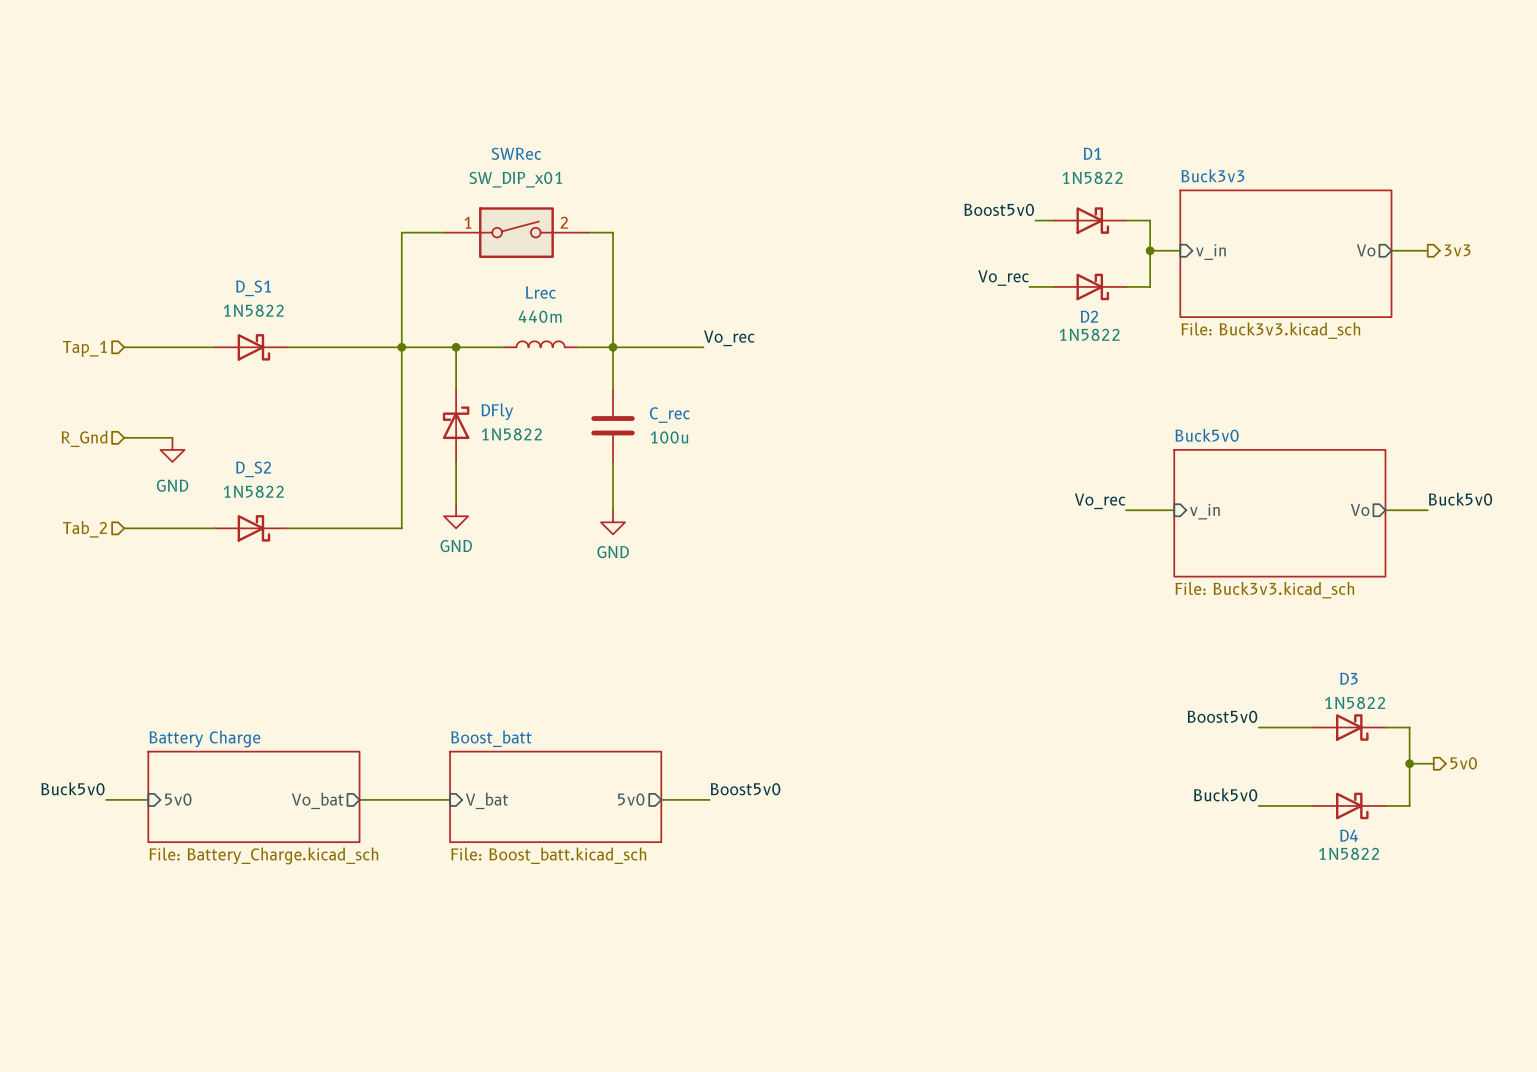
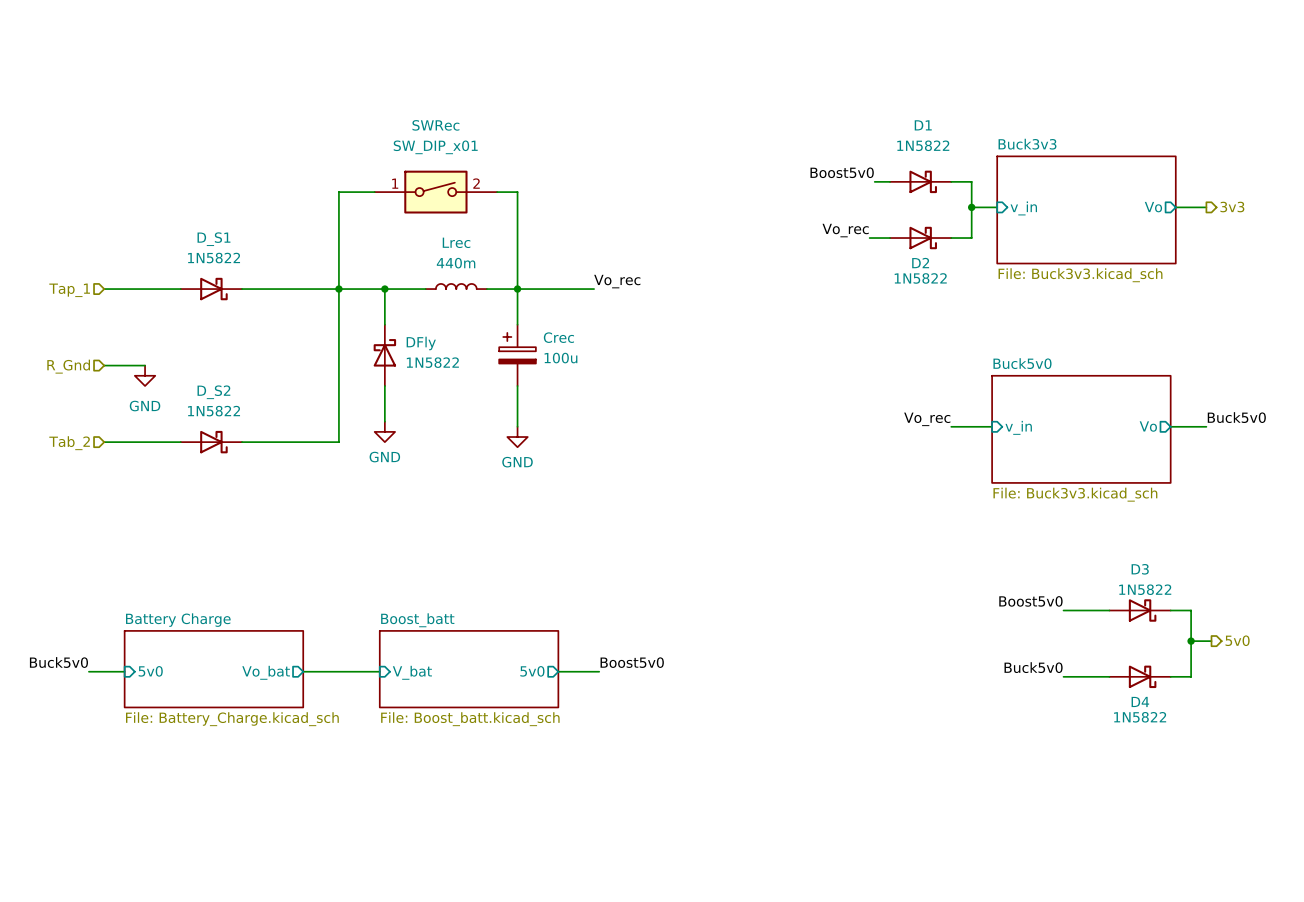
C_rec: 100u (613, 425) -> none
Crec: none -> 100u (517, 355)

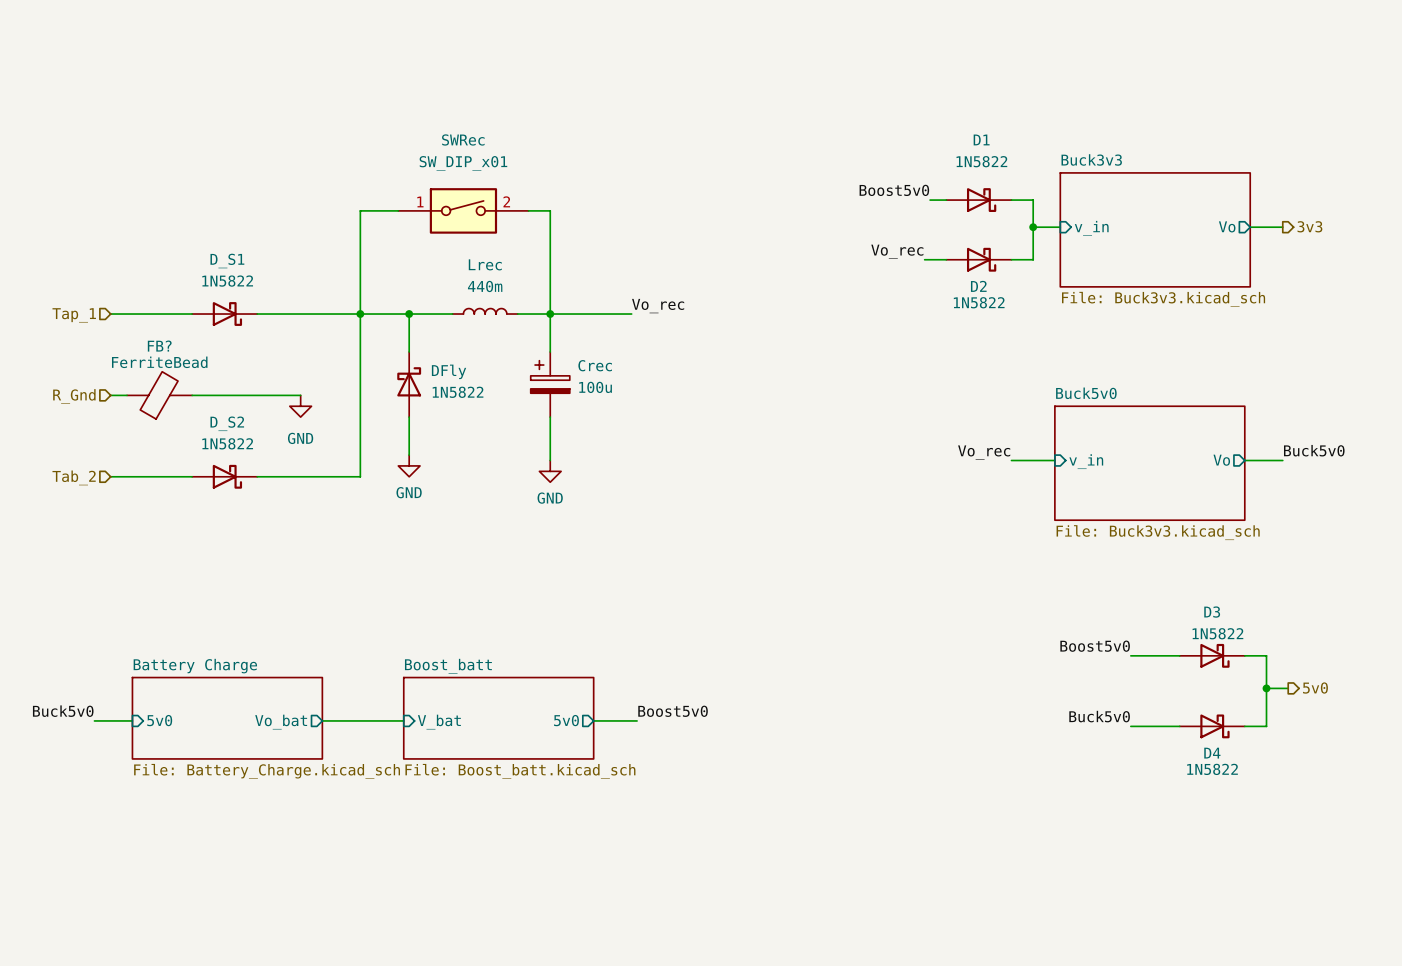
FB?: none -> FerriteBead (159, 395)
wire: none -> (192, 395) (300, 395)
power symbol position: GND (145, 375) -> GND (300, 406)

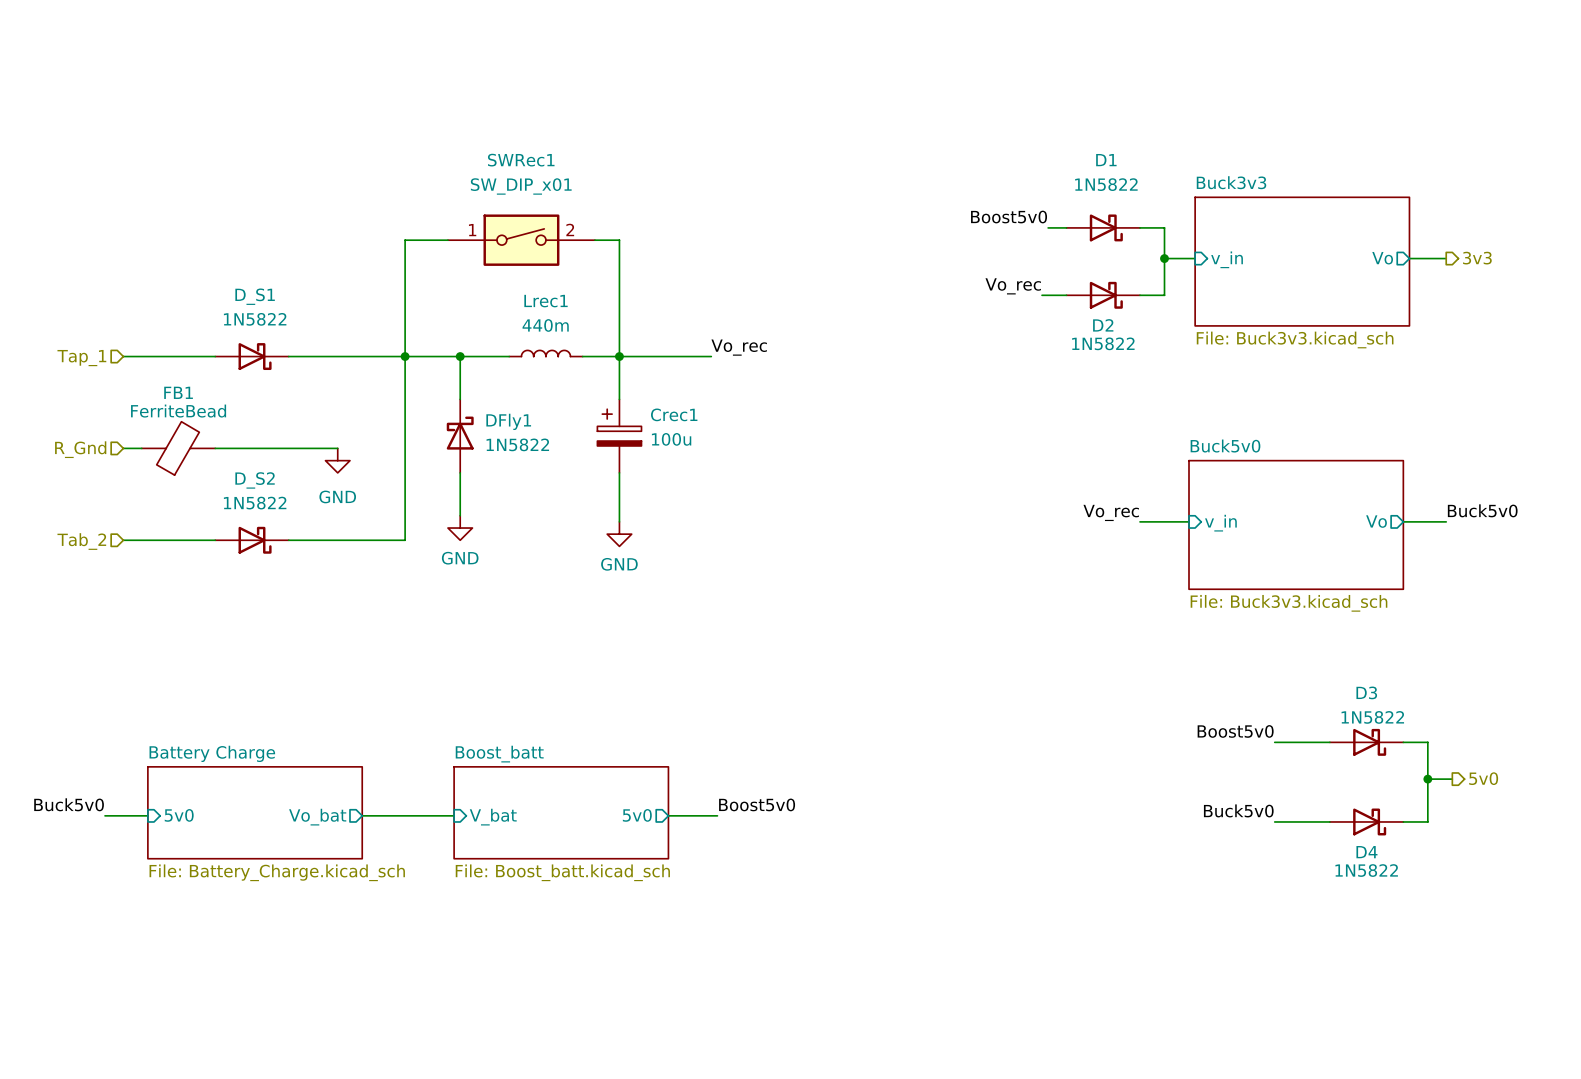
SWRec name: SWRec (463, 139) -> SWRec1 (521, 160)
Lrec name: Lrec (485, 264) -> Lrec1 (546, 301)
FB? name: FB? (159, 346) -> FB1 (178, 392)
Crec name: Crec (595, 365) -> Crec1 (674, 414)
DFly name: DFly (449, 371) -> DFly1 (508, 421)

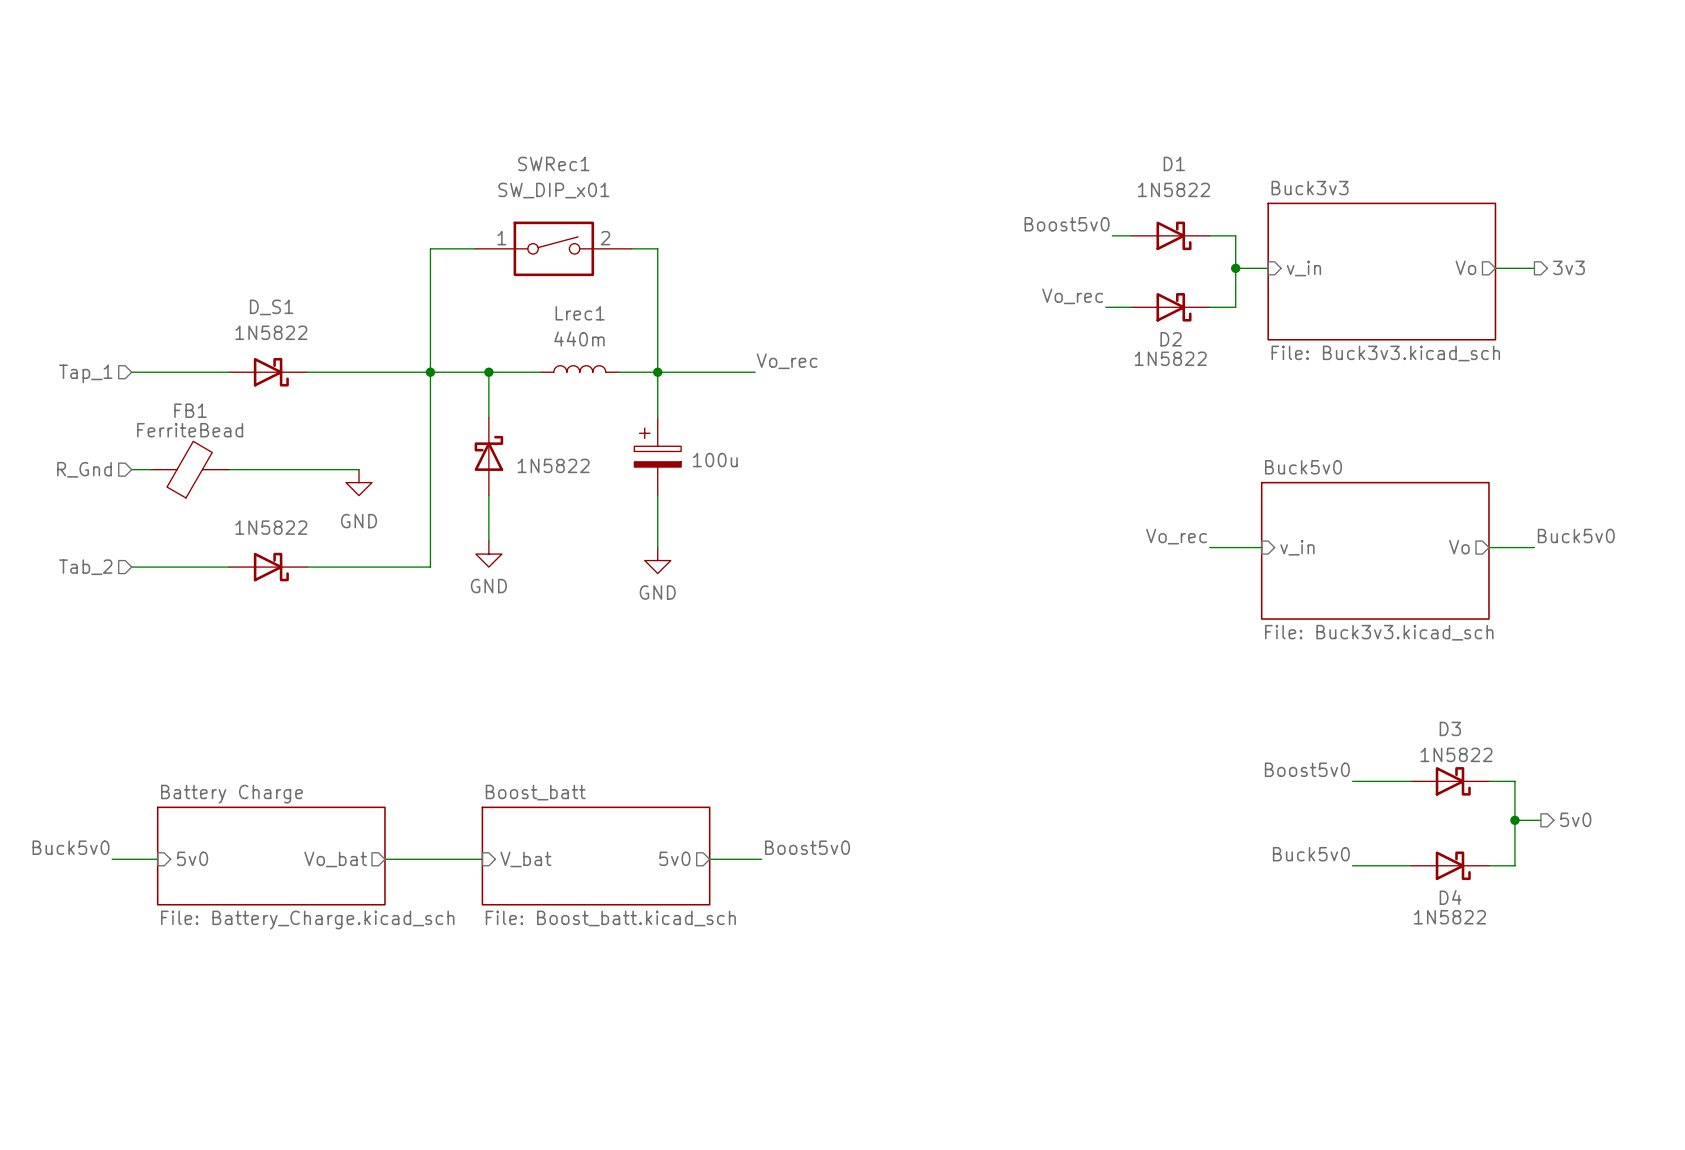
Crec1 name: Crec1 (674, 414) -> none
DFly1 name: DFly1 (508, 421) -> none
D_S2 name: D_S2 (255, 480) -> none

